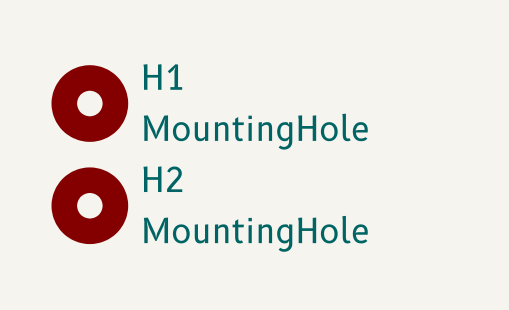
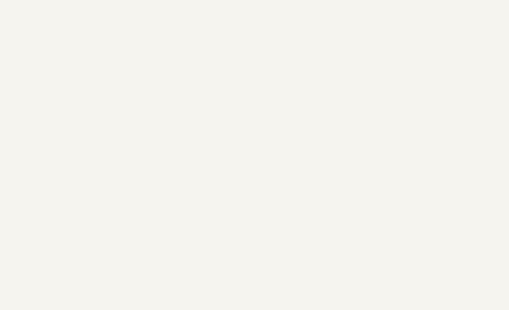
H1: MountingHole (89, 103) -> none
H2: MountingHole (89, 205) -> none

